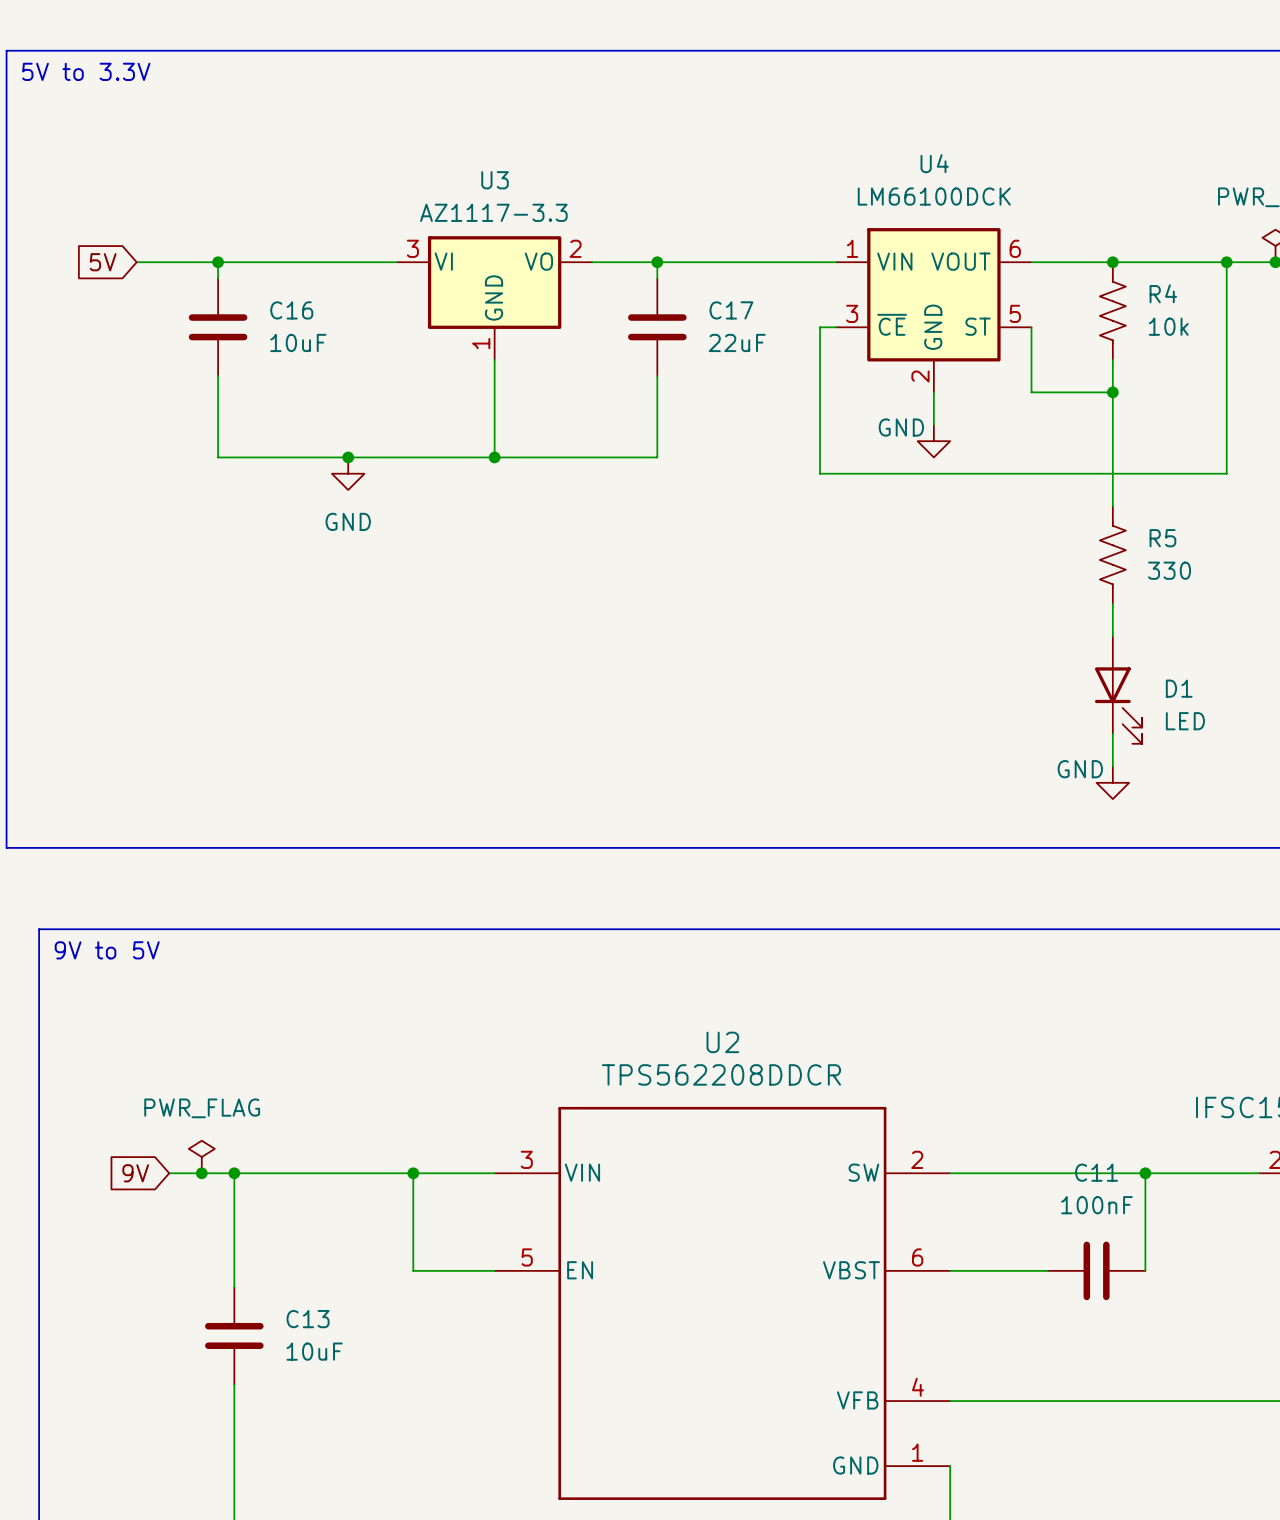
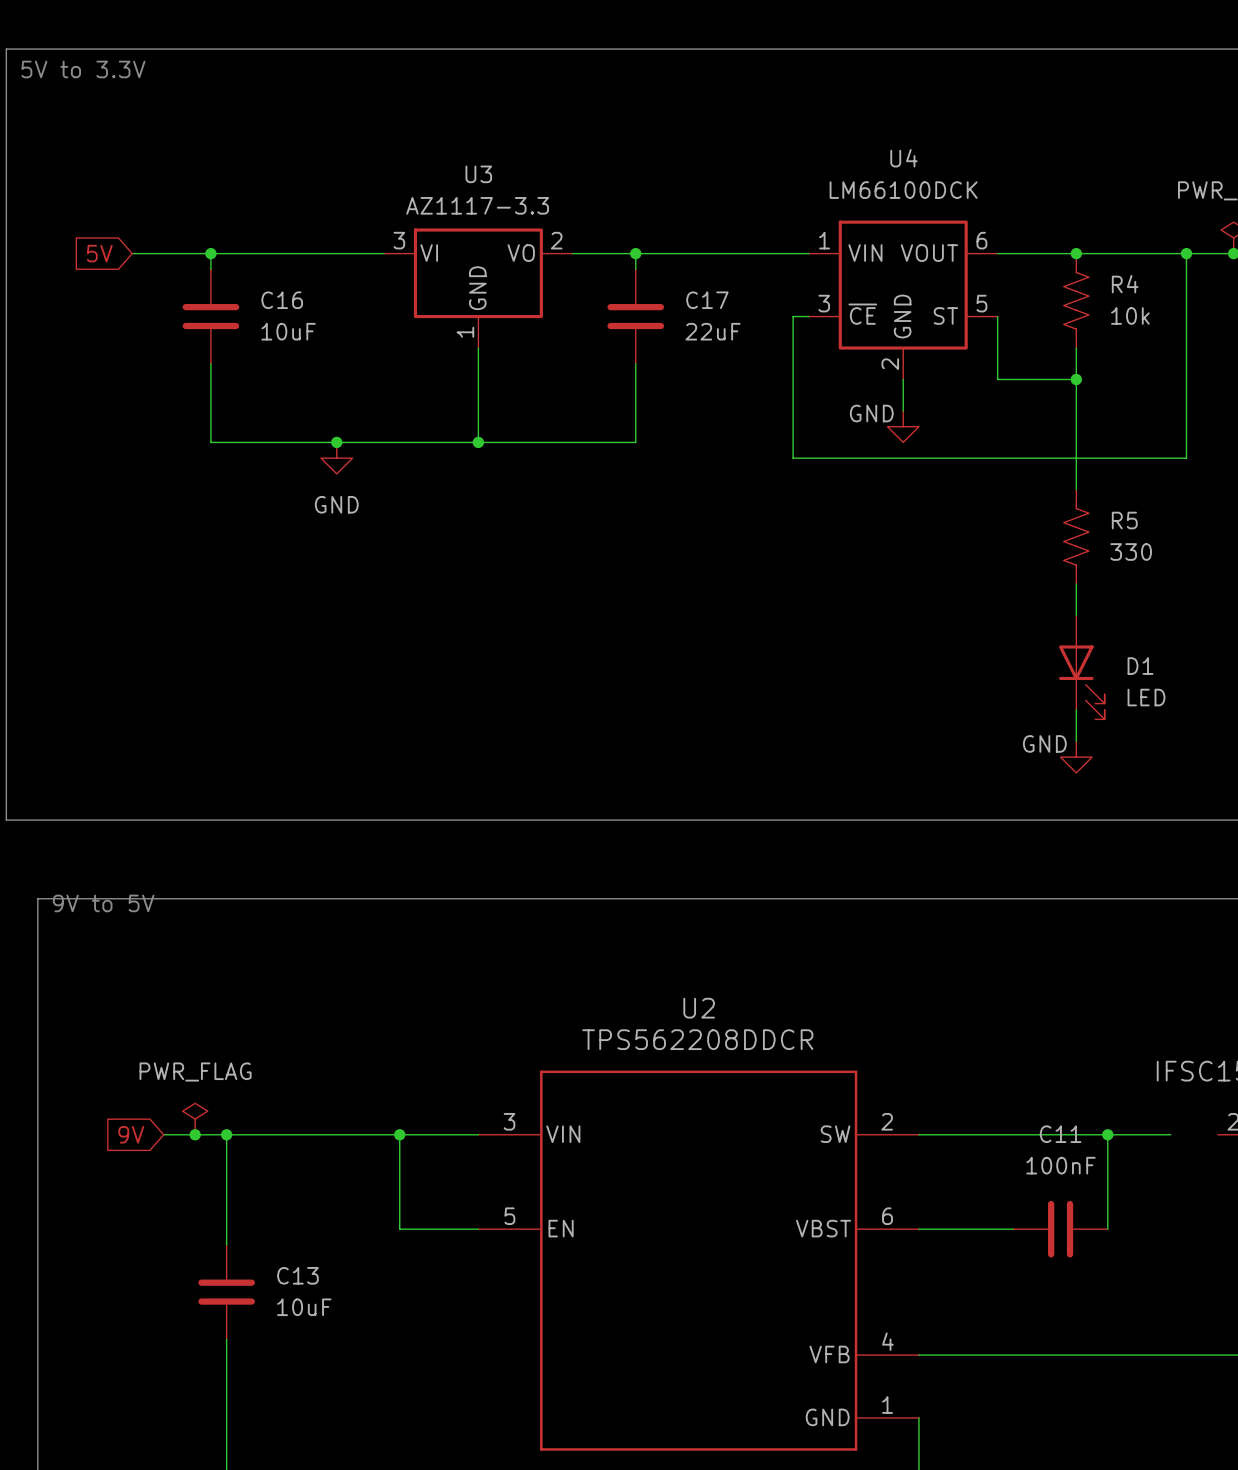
text position: 9V to 5V (107, 950) -> 9V to 5V (103, 903)
wire: (1210, 1173) (1259, 1173) -> none

